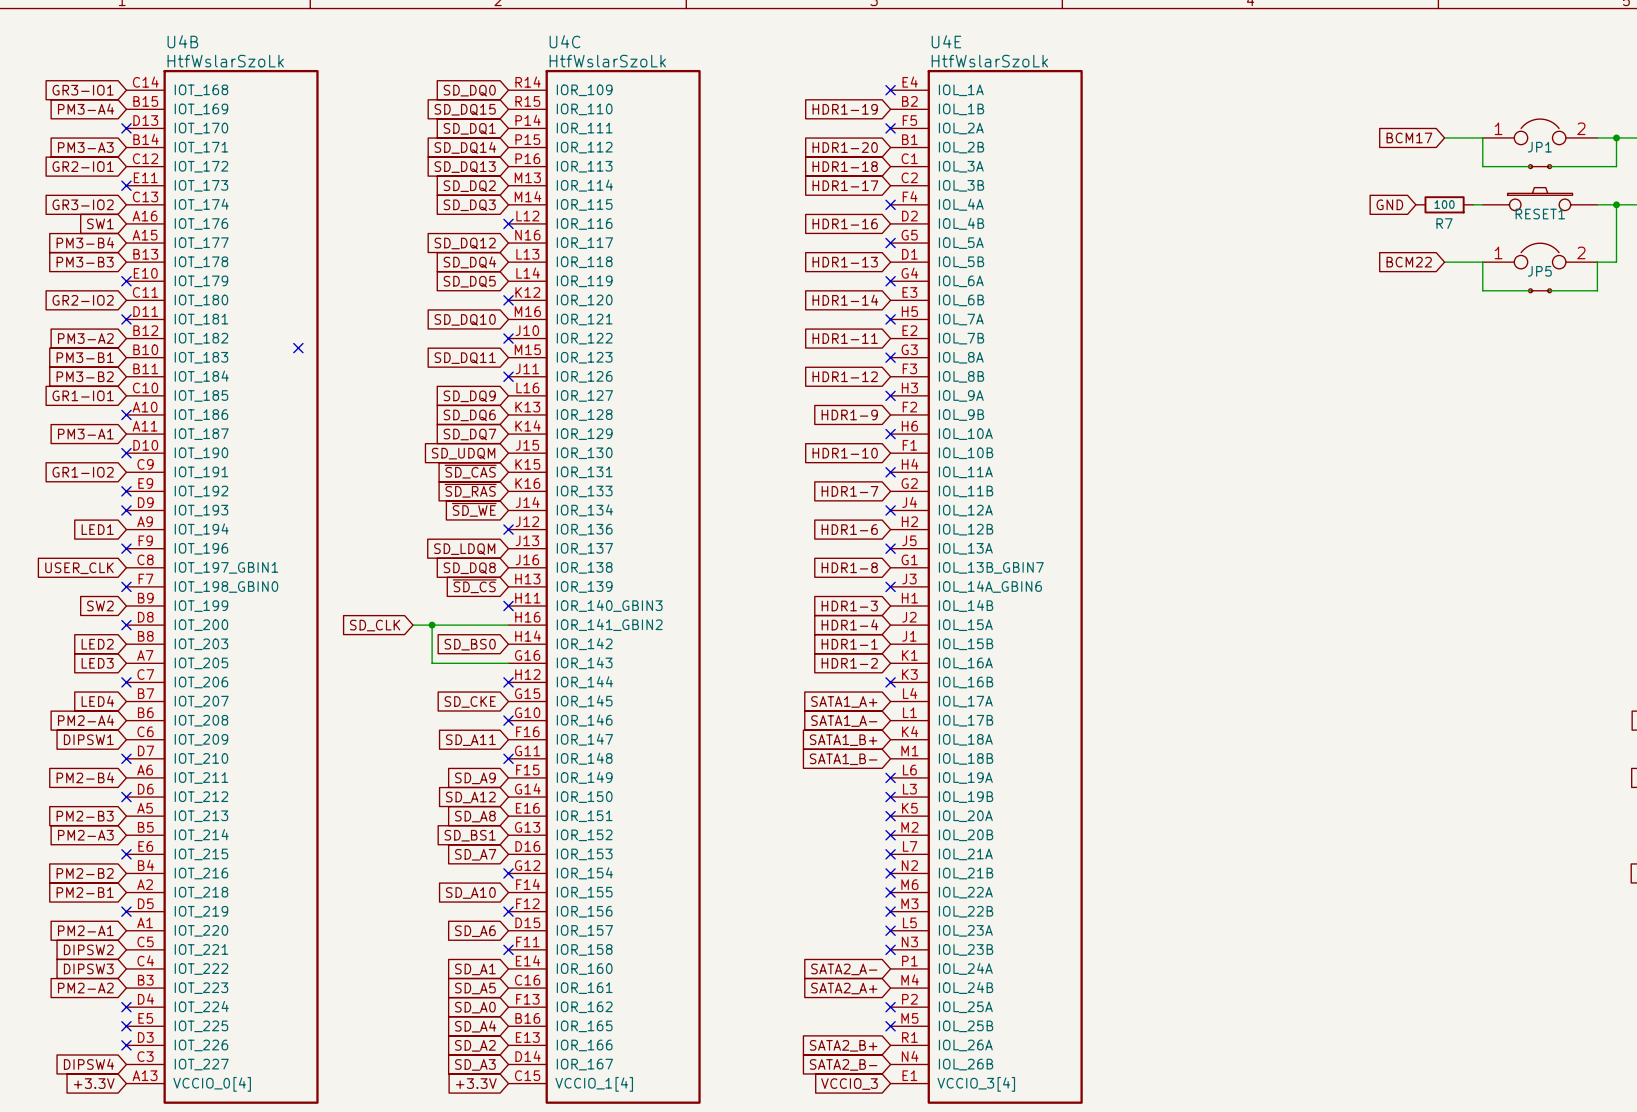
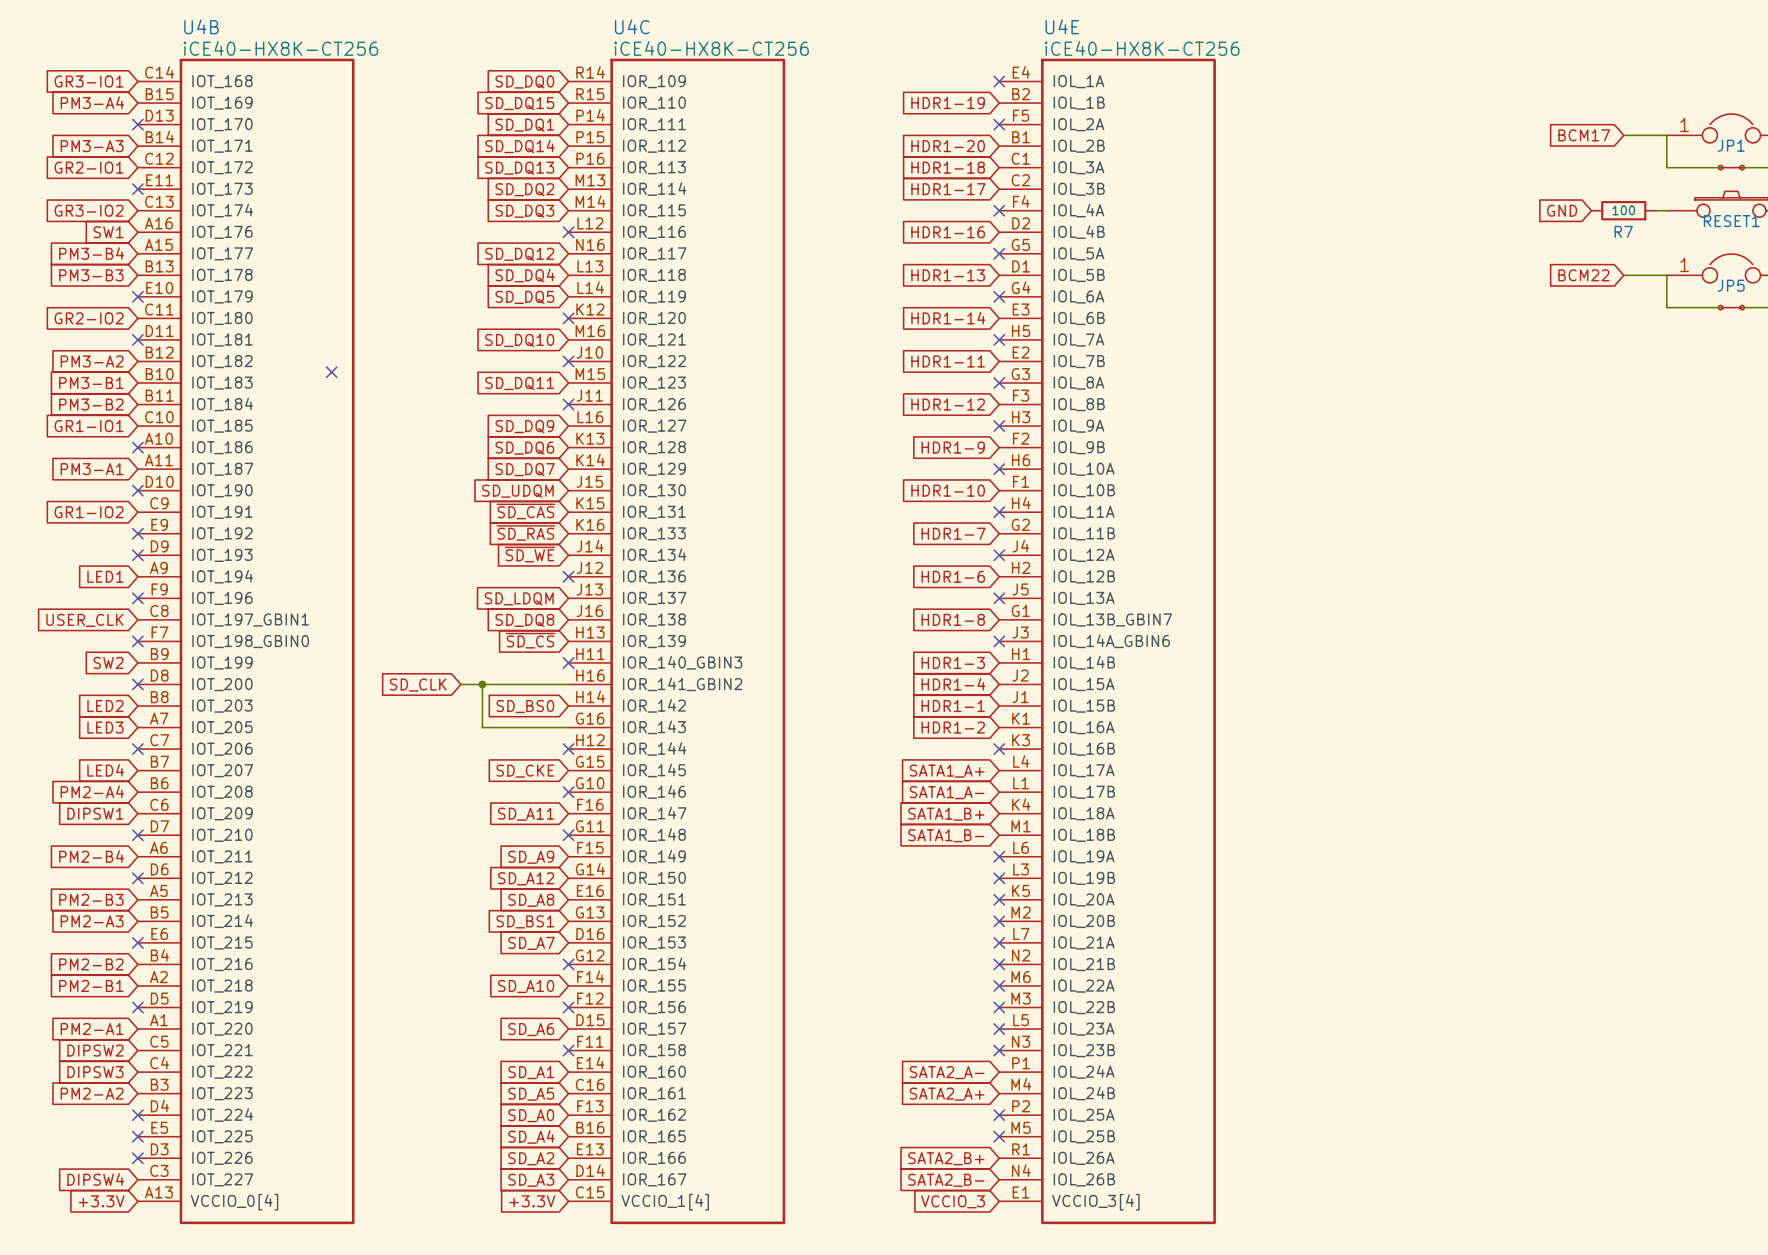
U4B value: HtfWslarSzoLk (225, 61) -> iCE40-HX8K-CT256 (280, 48)
U4C value: HtfWslarSzoLk (607, 61) -> iCE40-HX8K-CT256 (711, 48)
U4E value: HtfWslarSzoLk (989, 61) -> iCE40-HX8K-CT256 (1142, 48)

